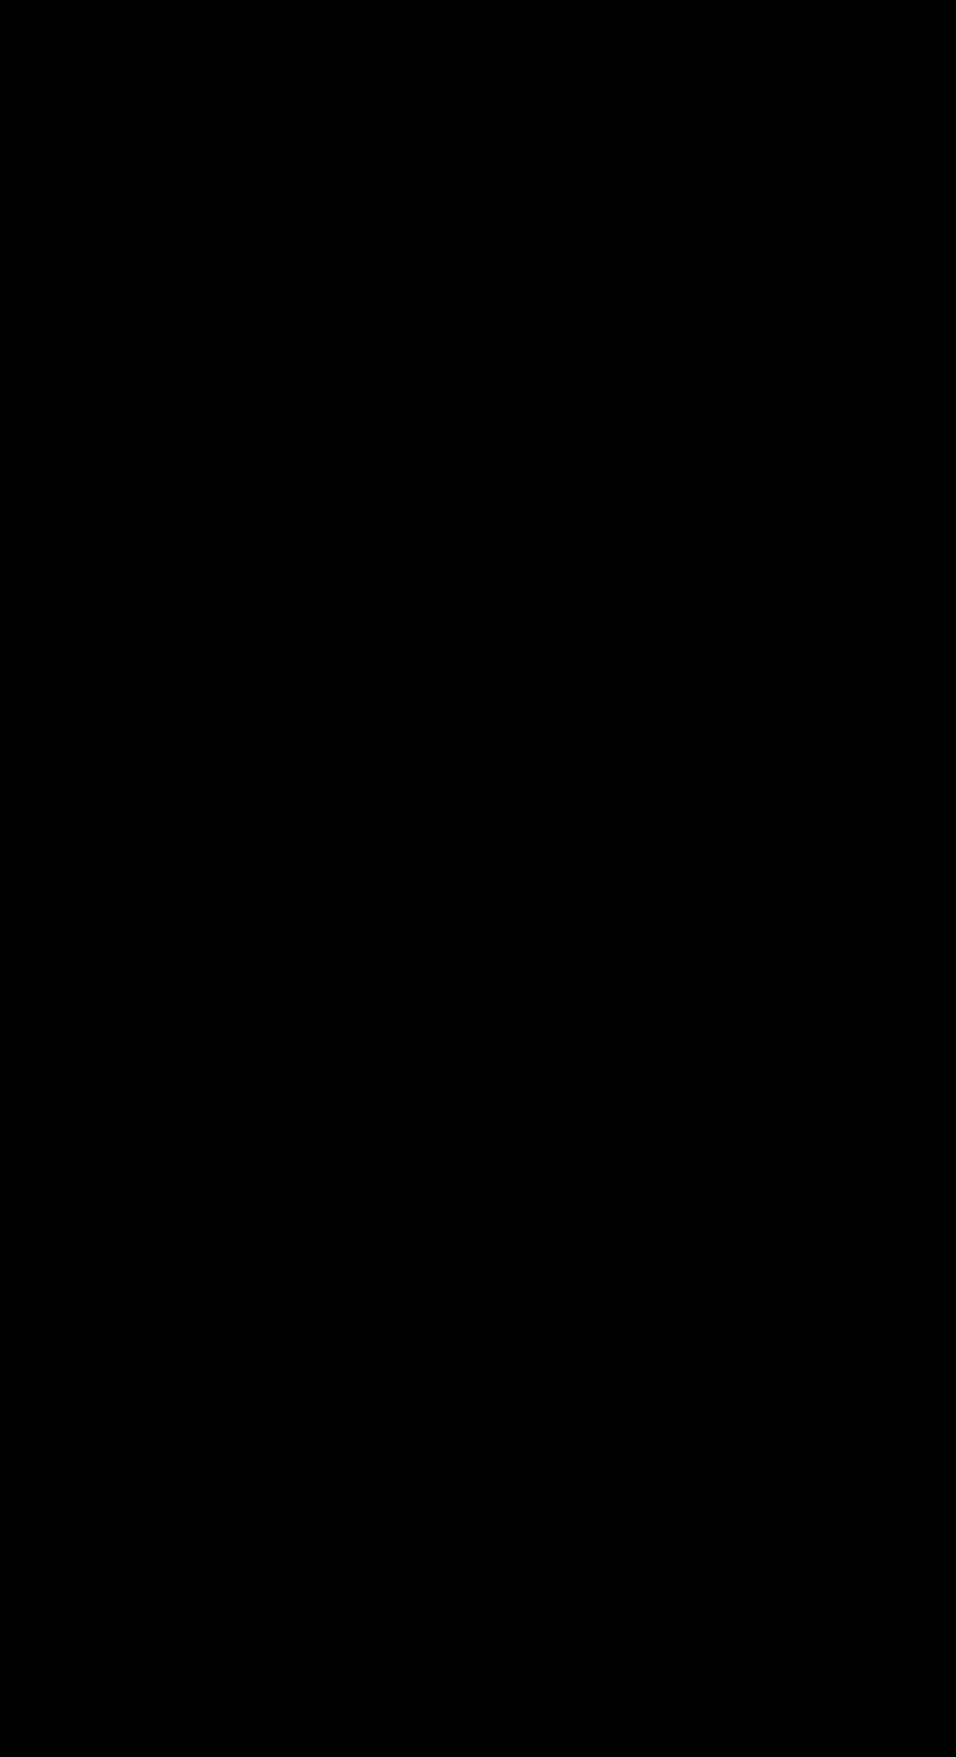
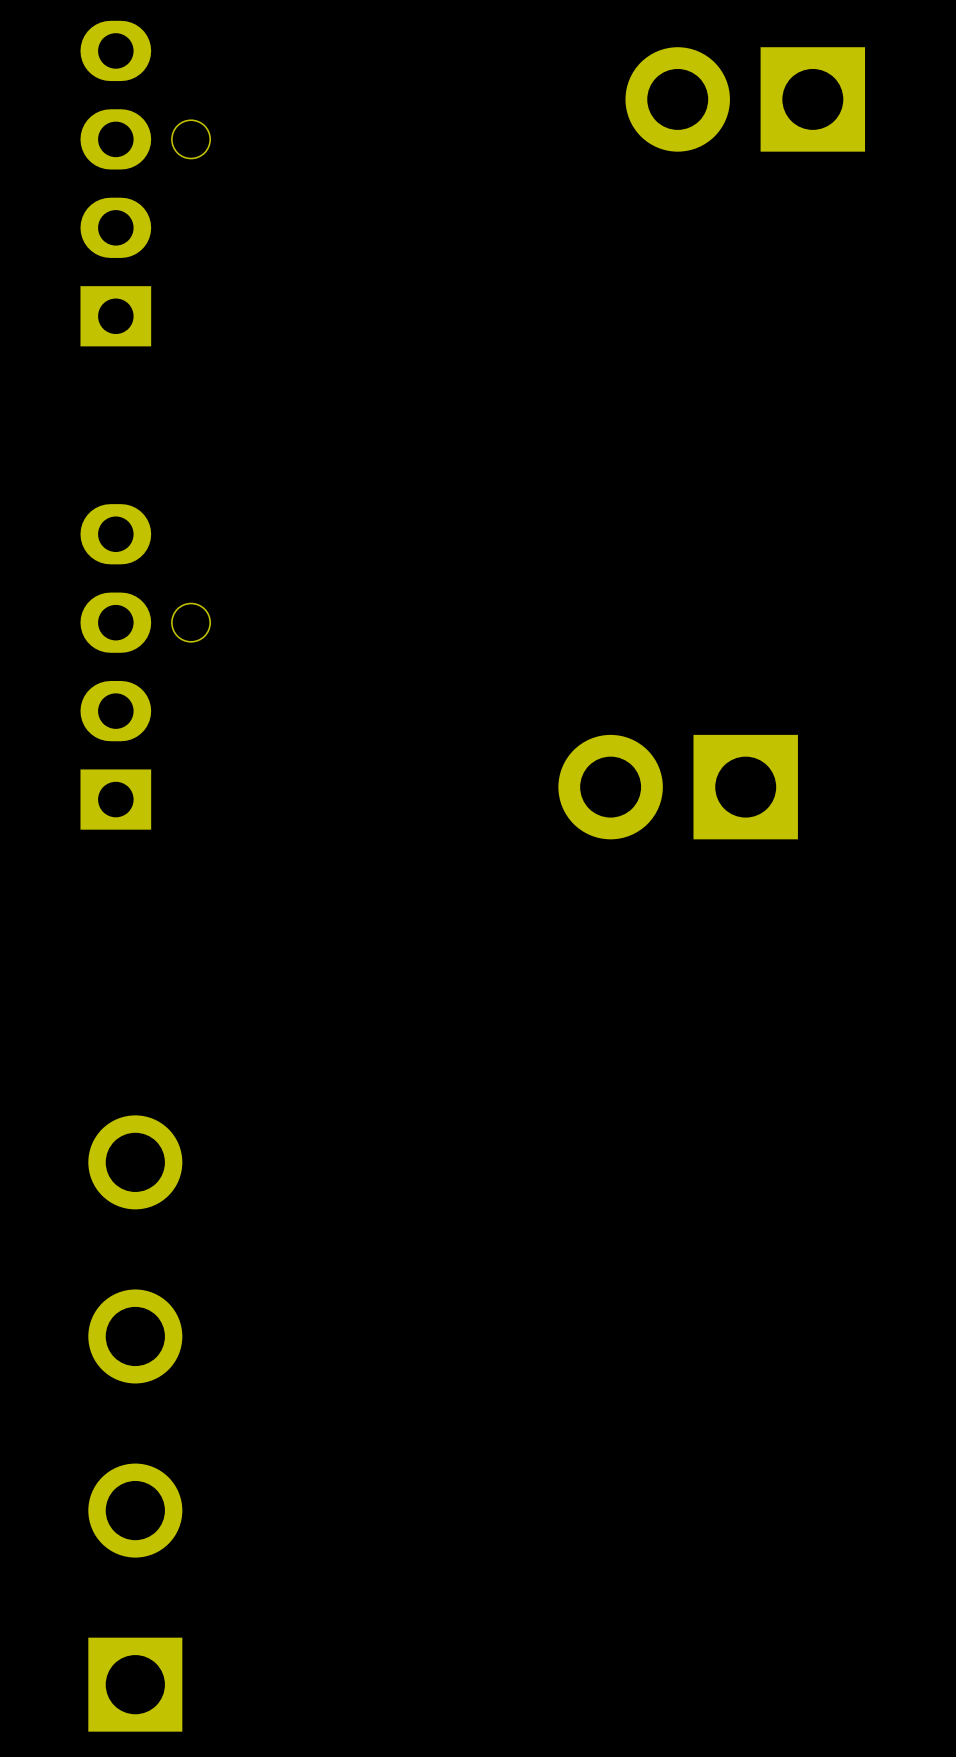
part: none -> (745, 99)
part: none -> (145, 183)
part: none -> (145, 666)
part: none -> (678, 787)
part: none -> (135, 1423)

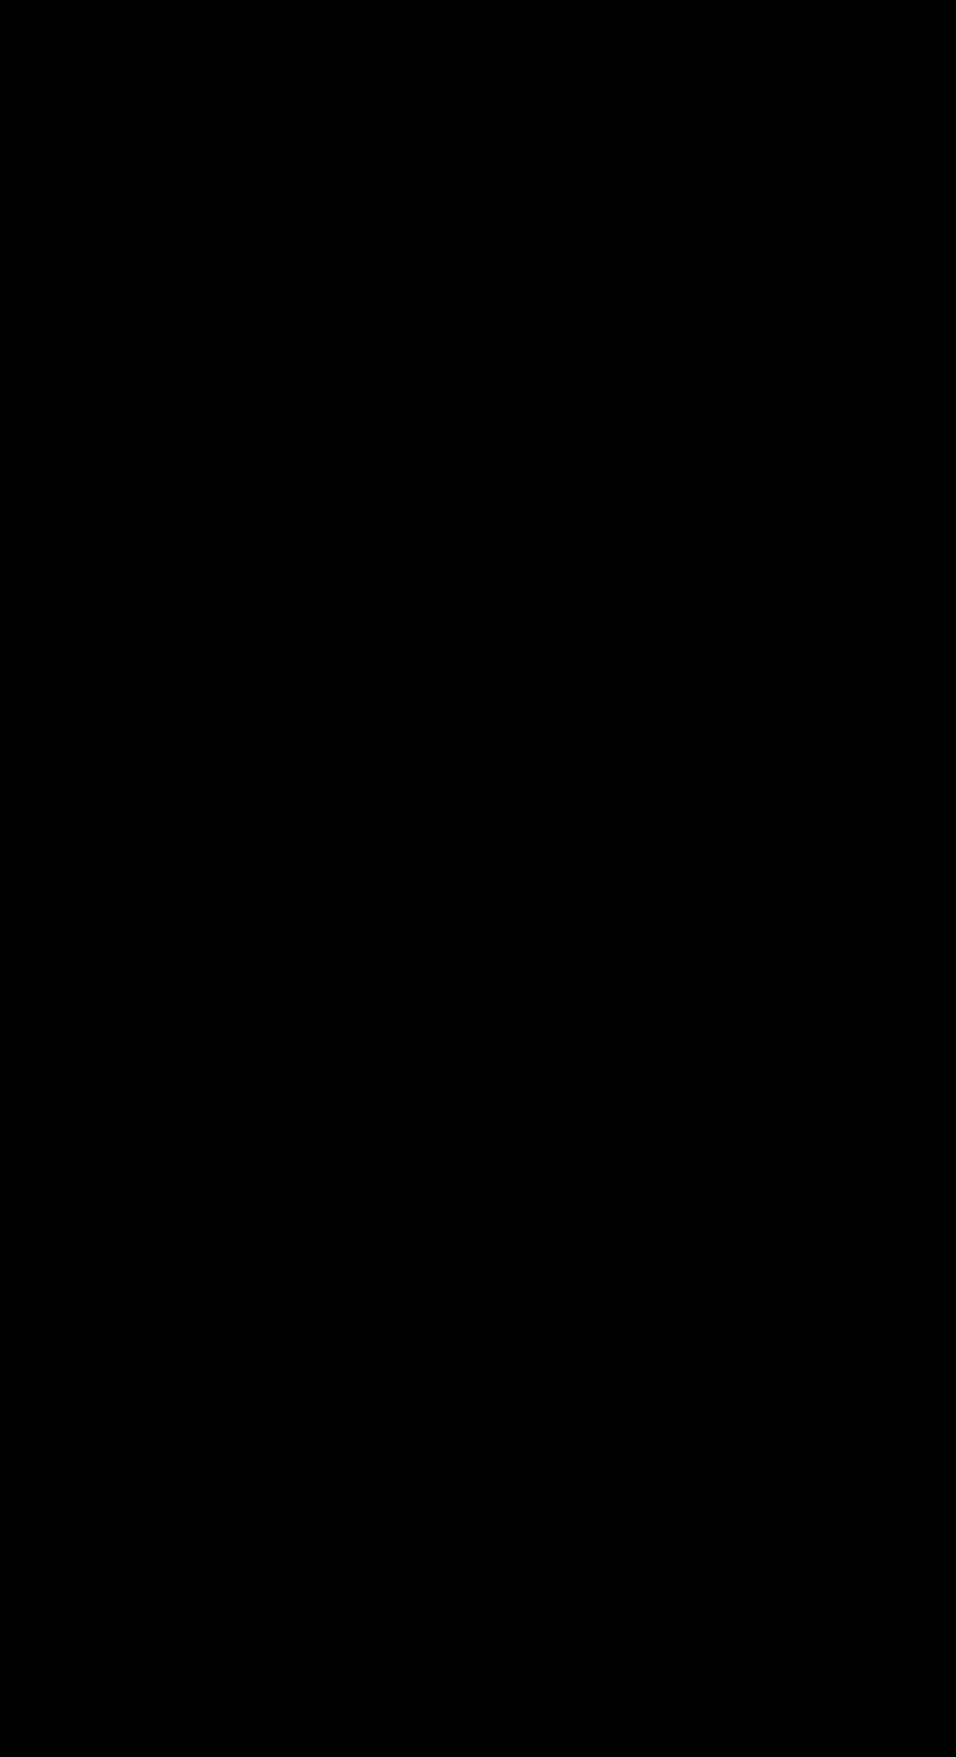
part: (745, 99) -> none
part: (145, 183) -> none
part: (145, 666) -> none
part: (678, 787) -> none
part: (135, 1423) -> none

